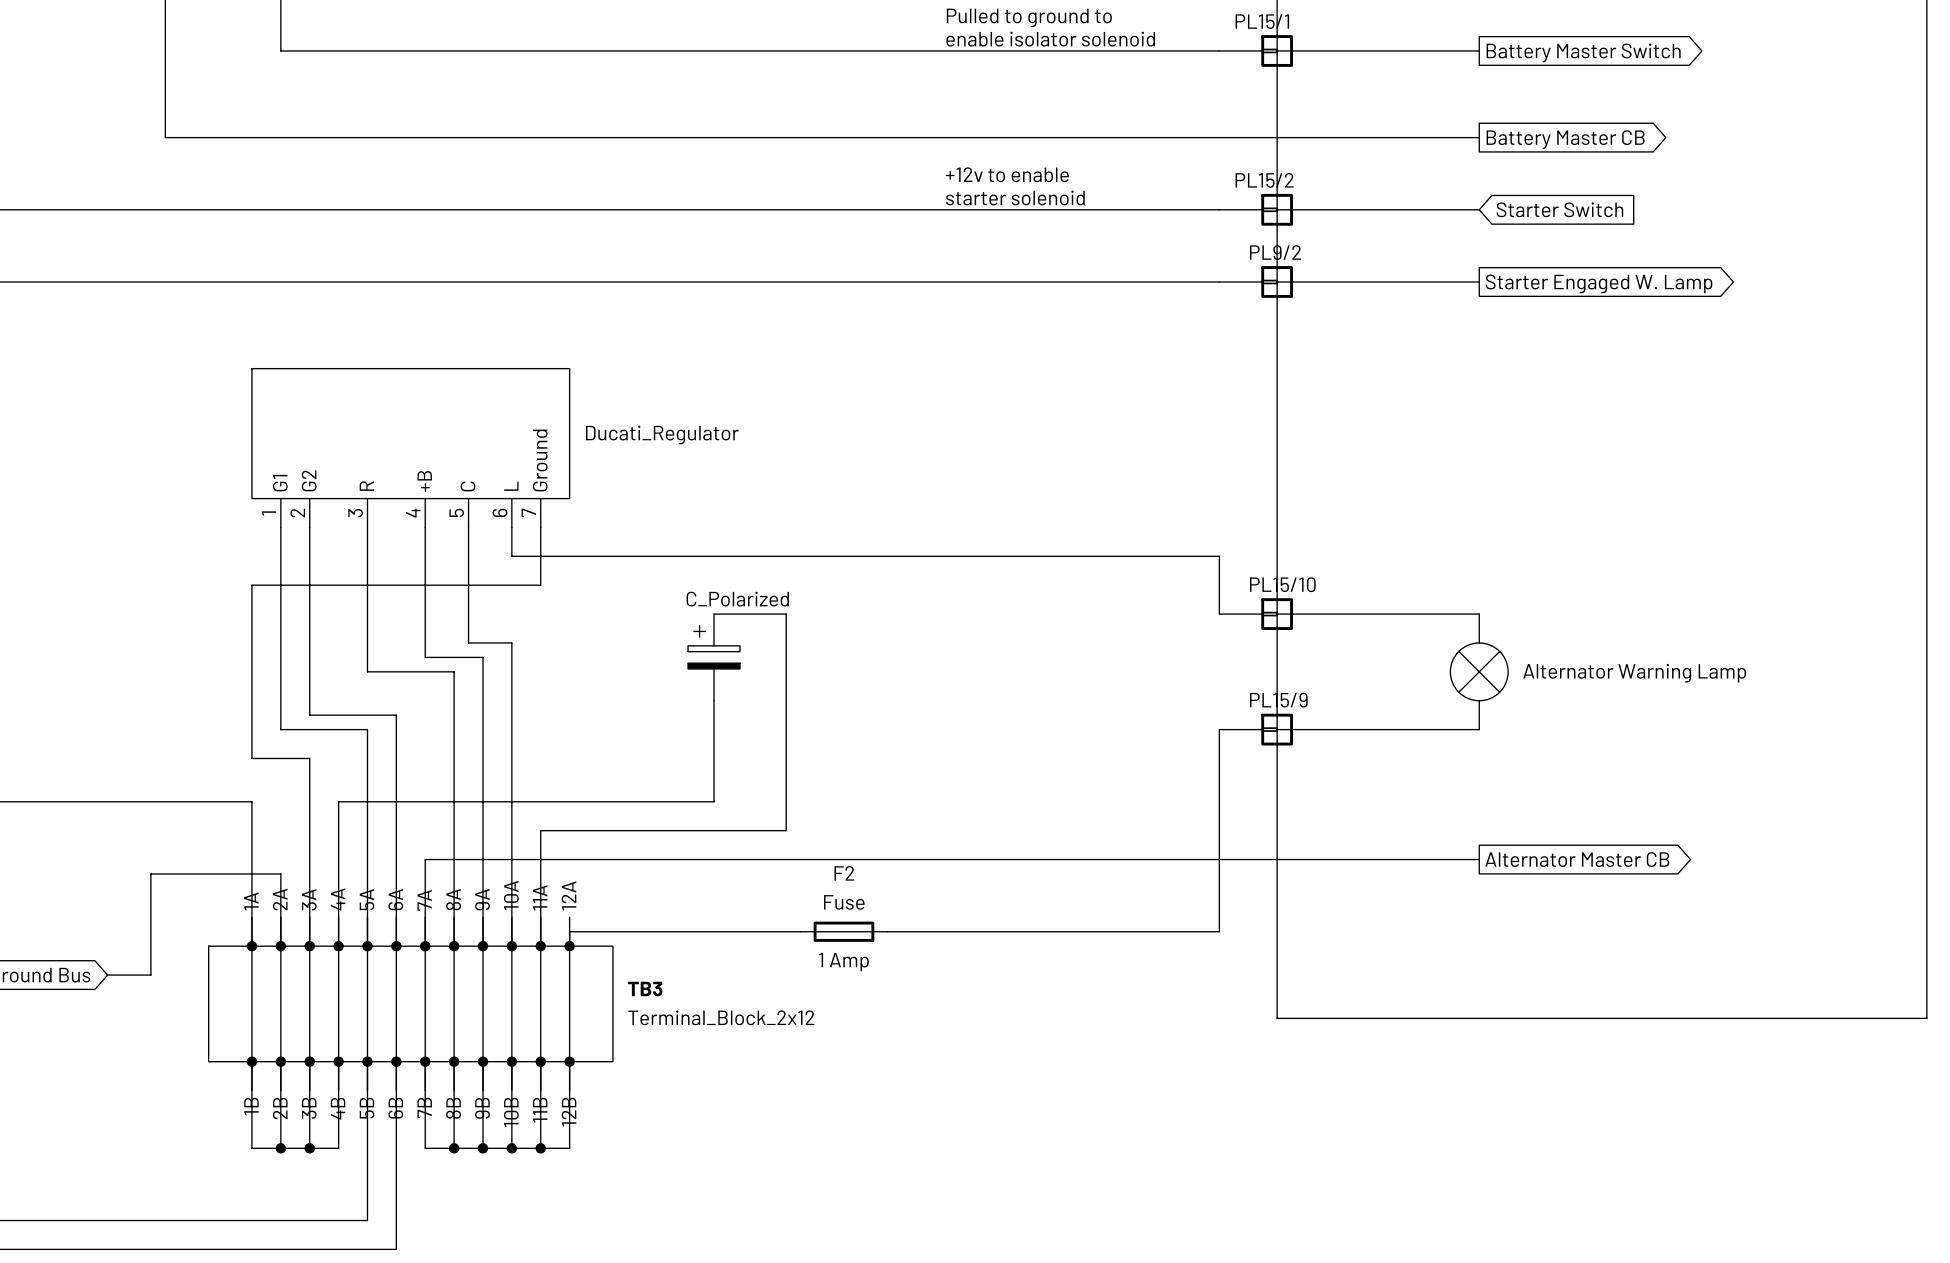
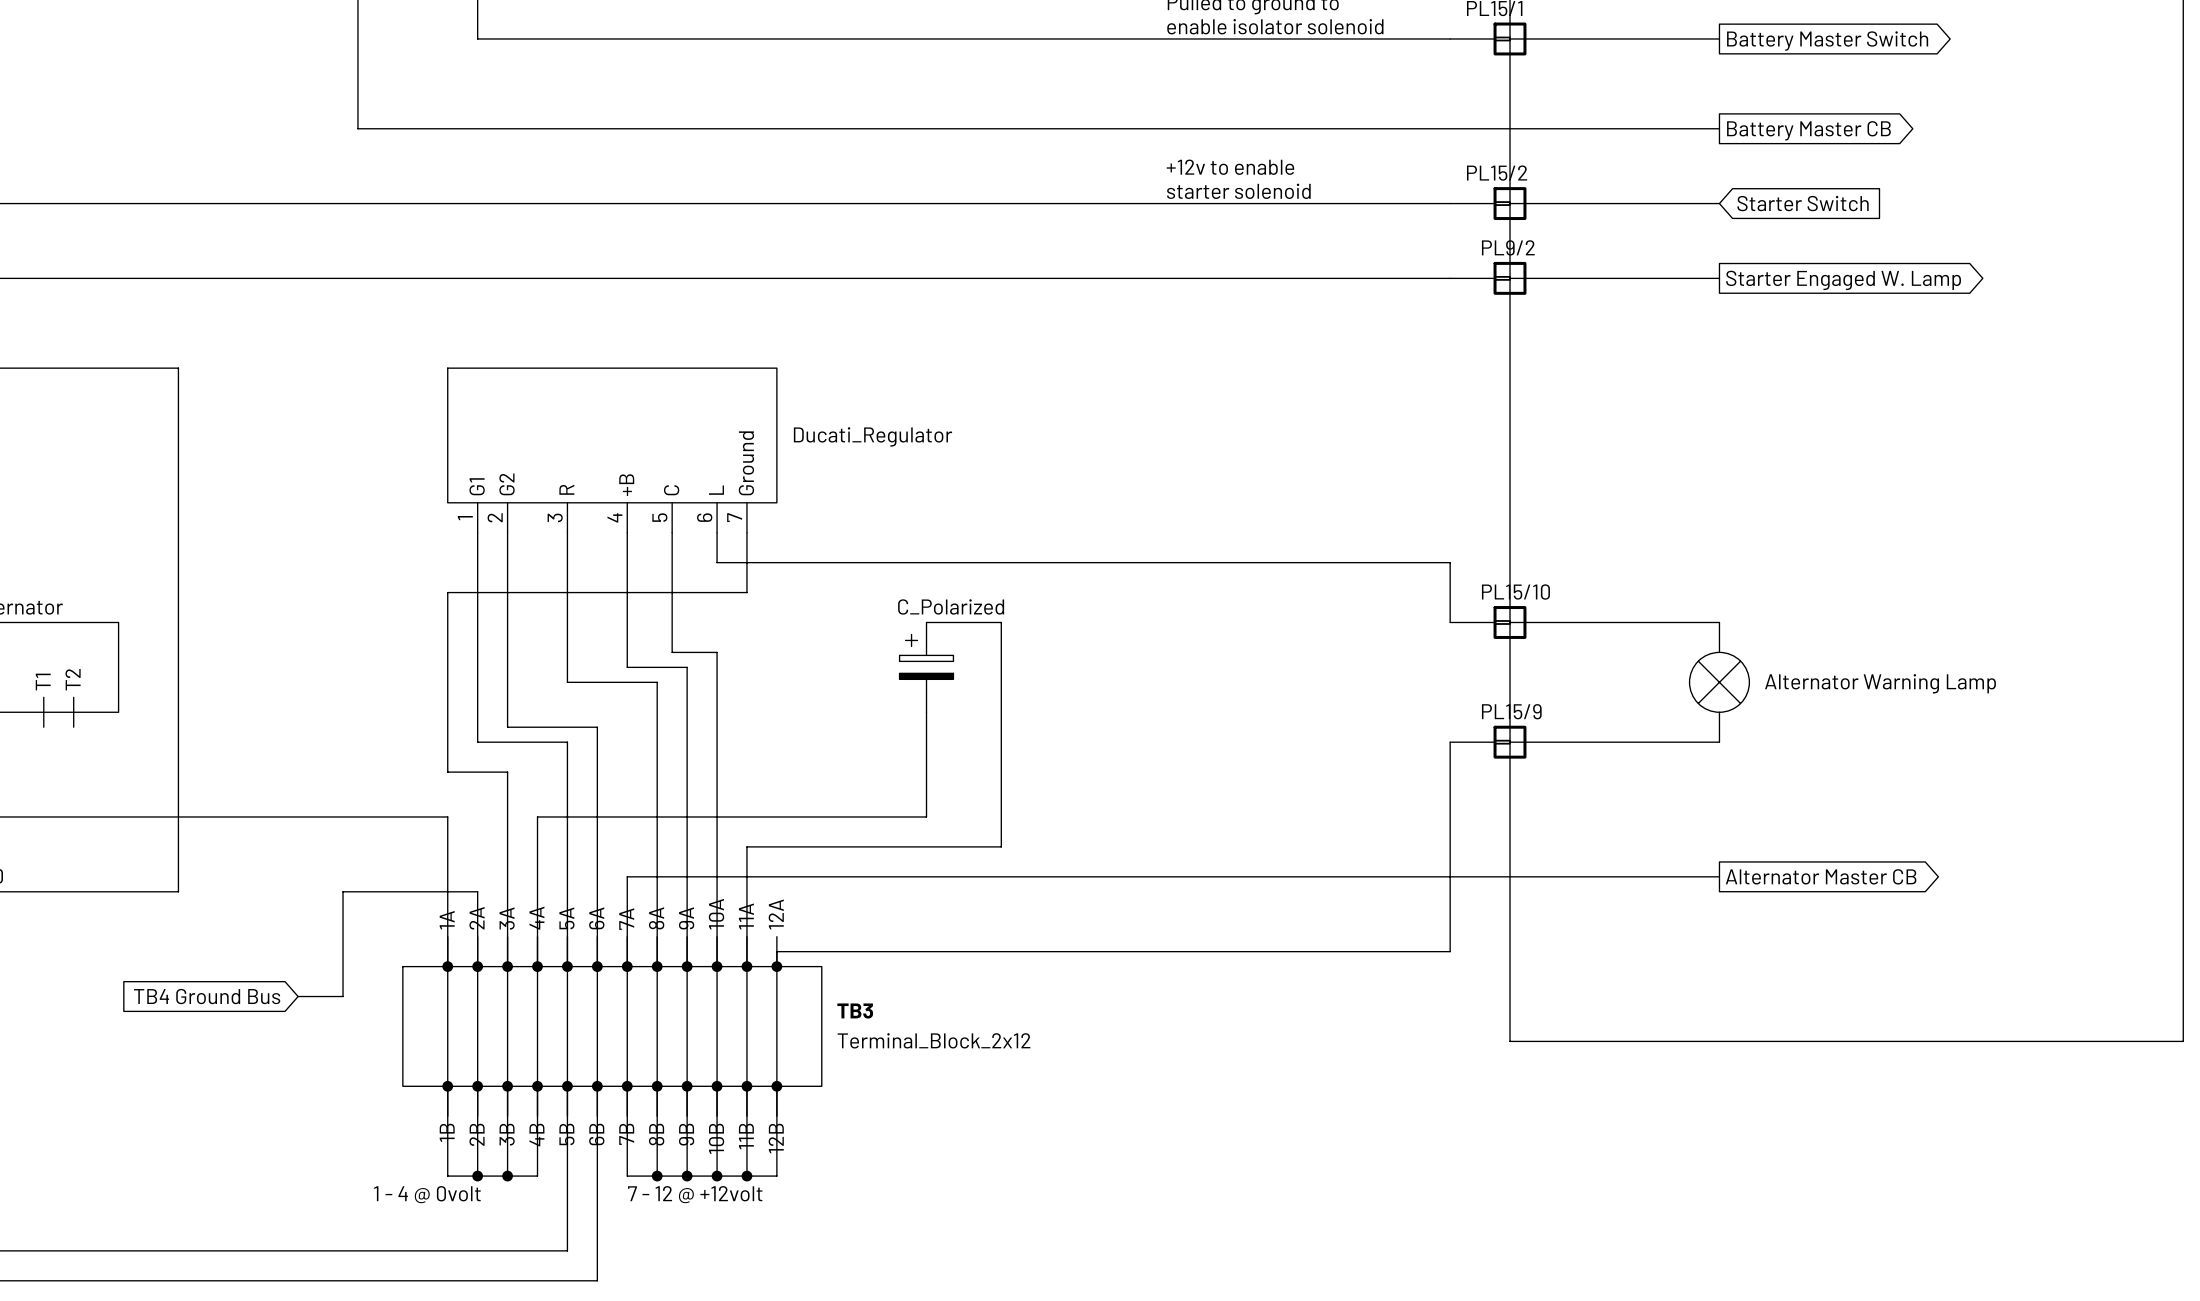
F2: Fuse (843, 931) -> none
text: none -> 1 - 4 @ 0volt (427, 1194)
text: none -> 7 - 12 @ +12volt (695, 1194)

